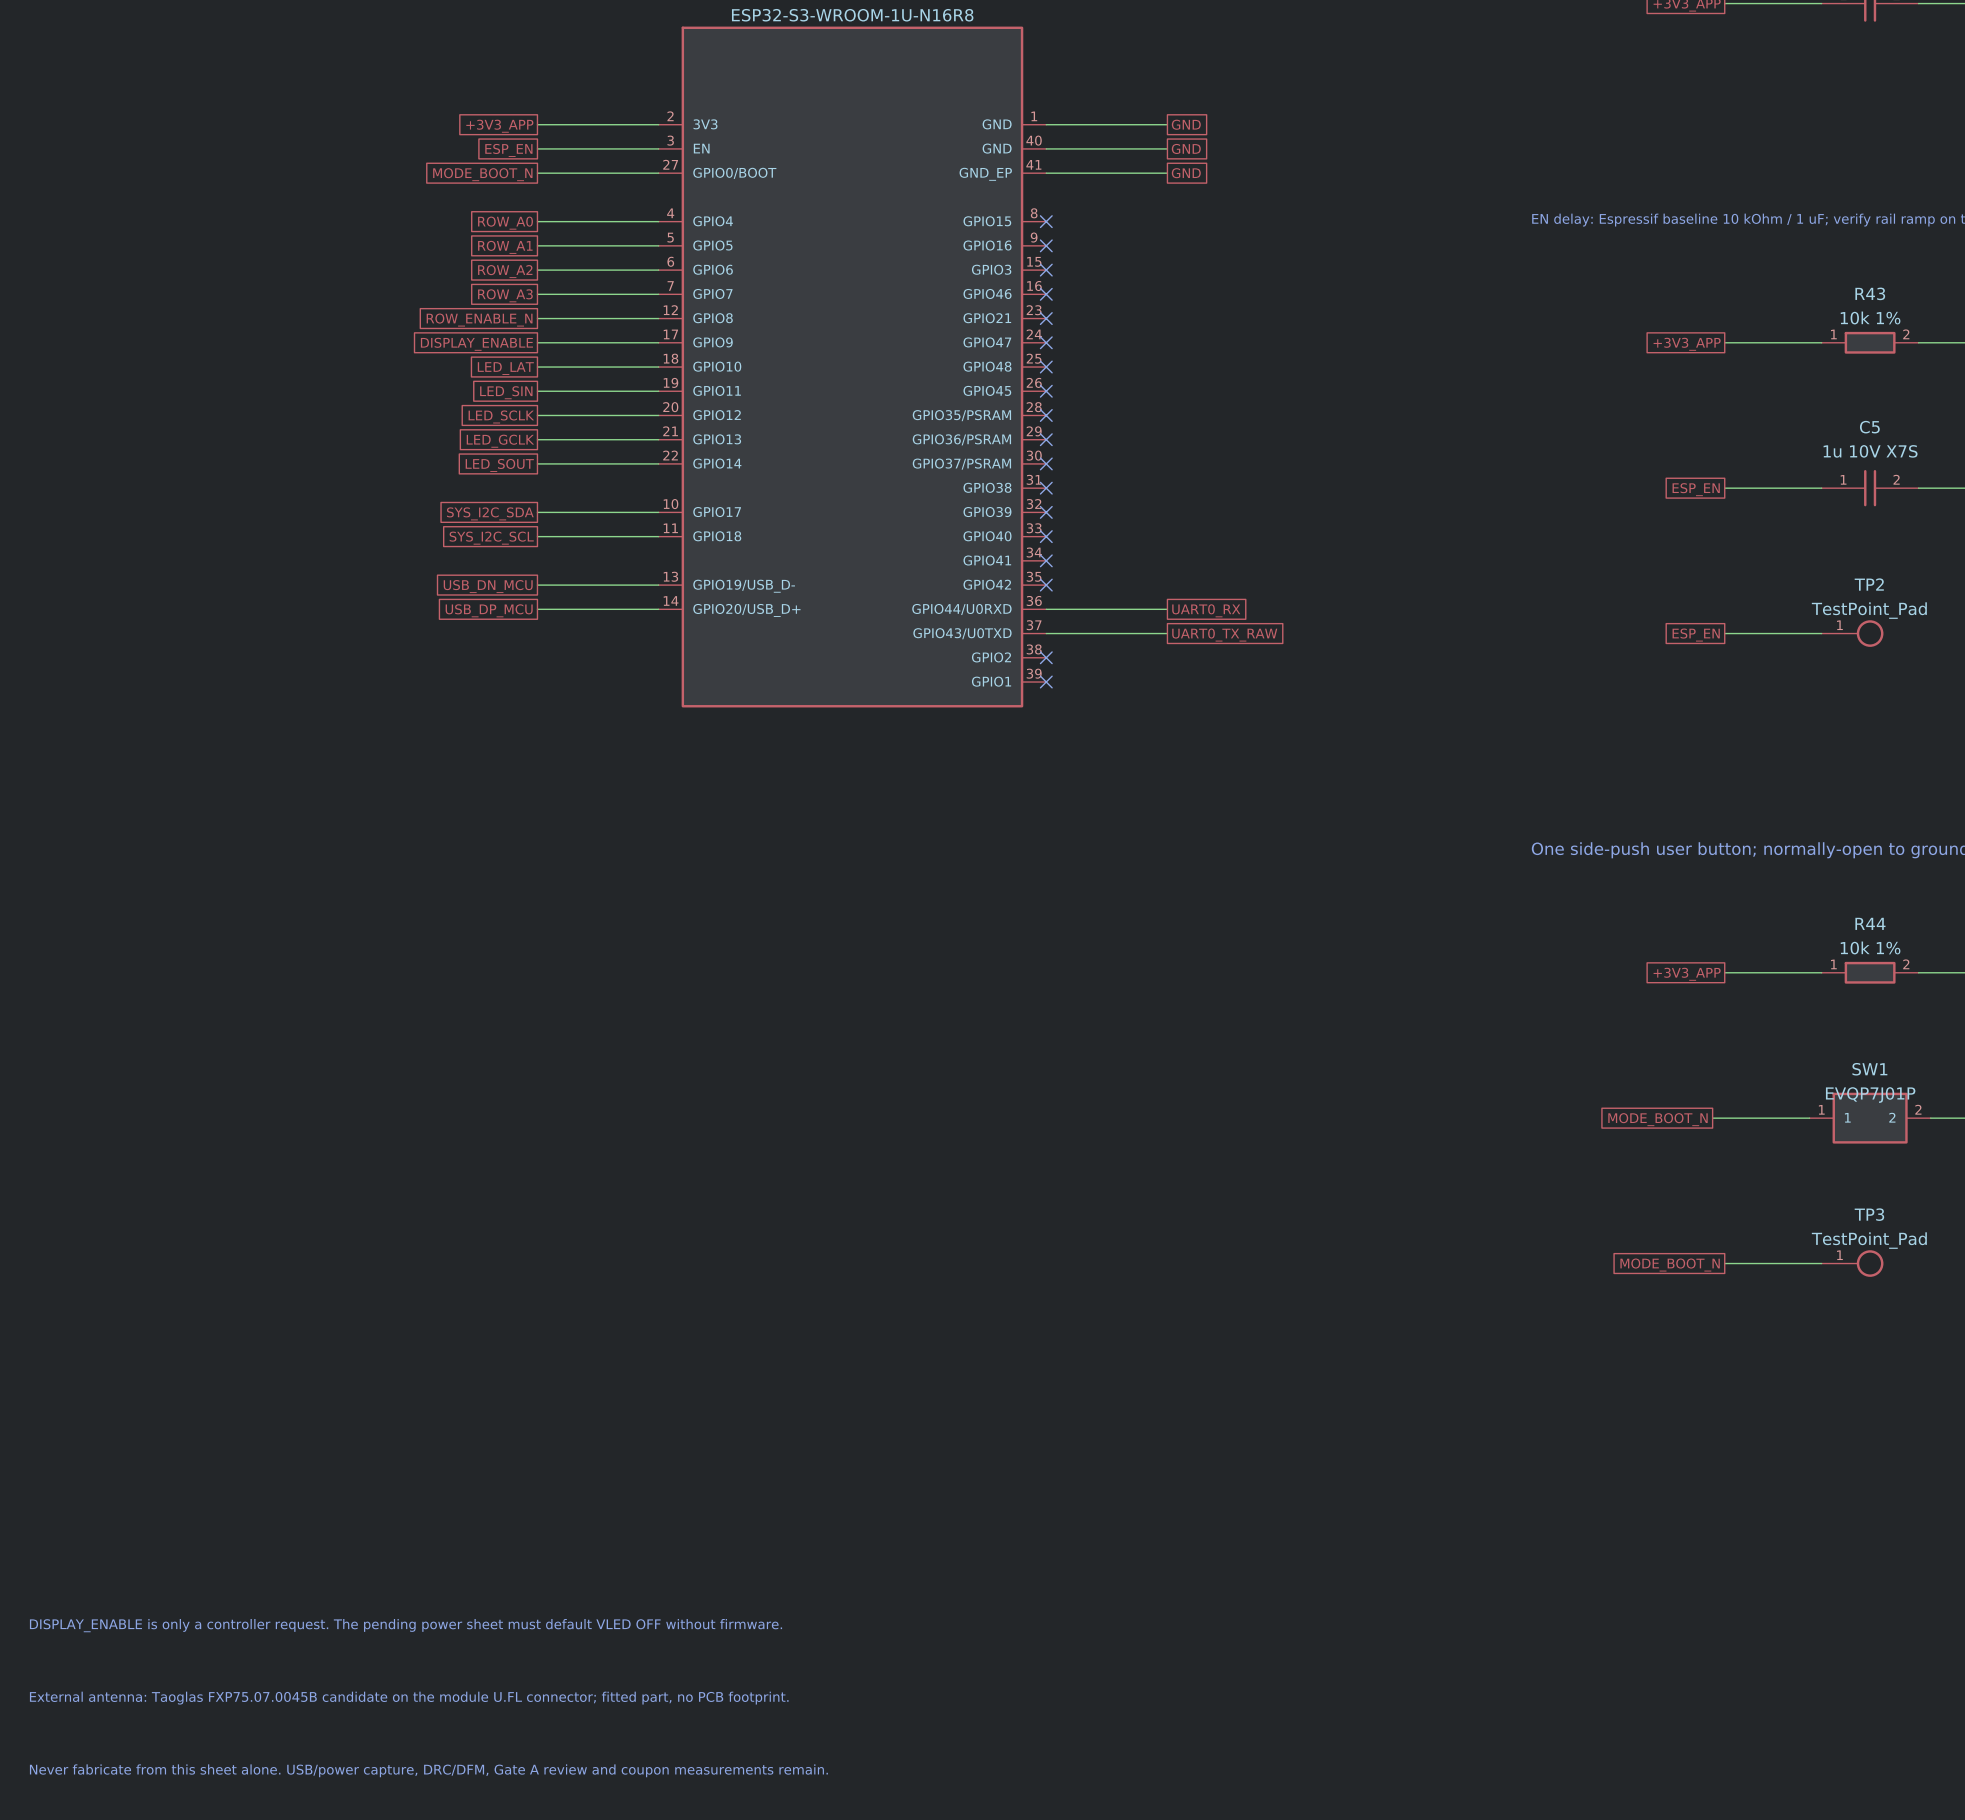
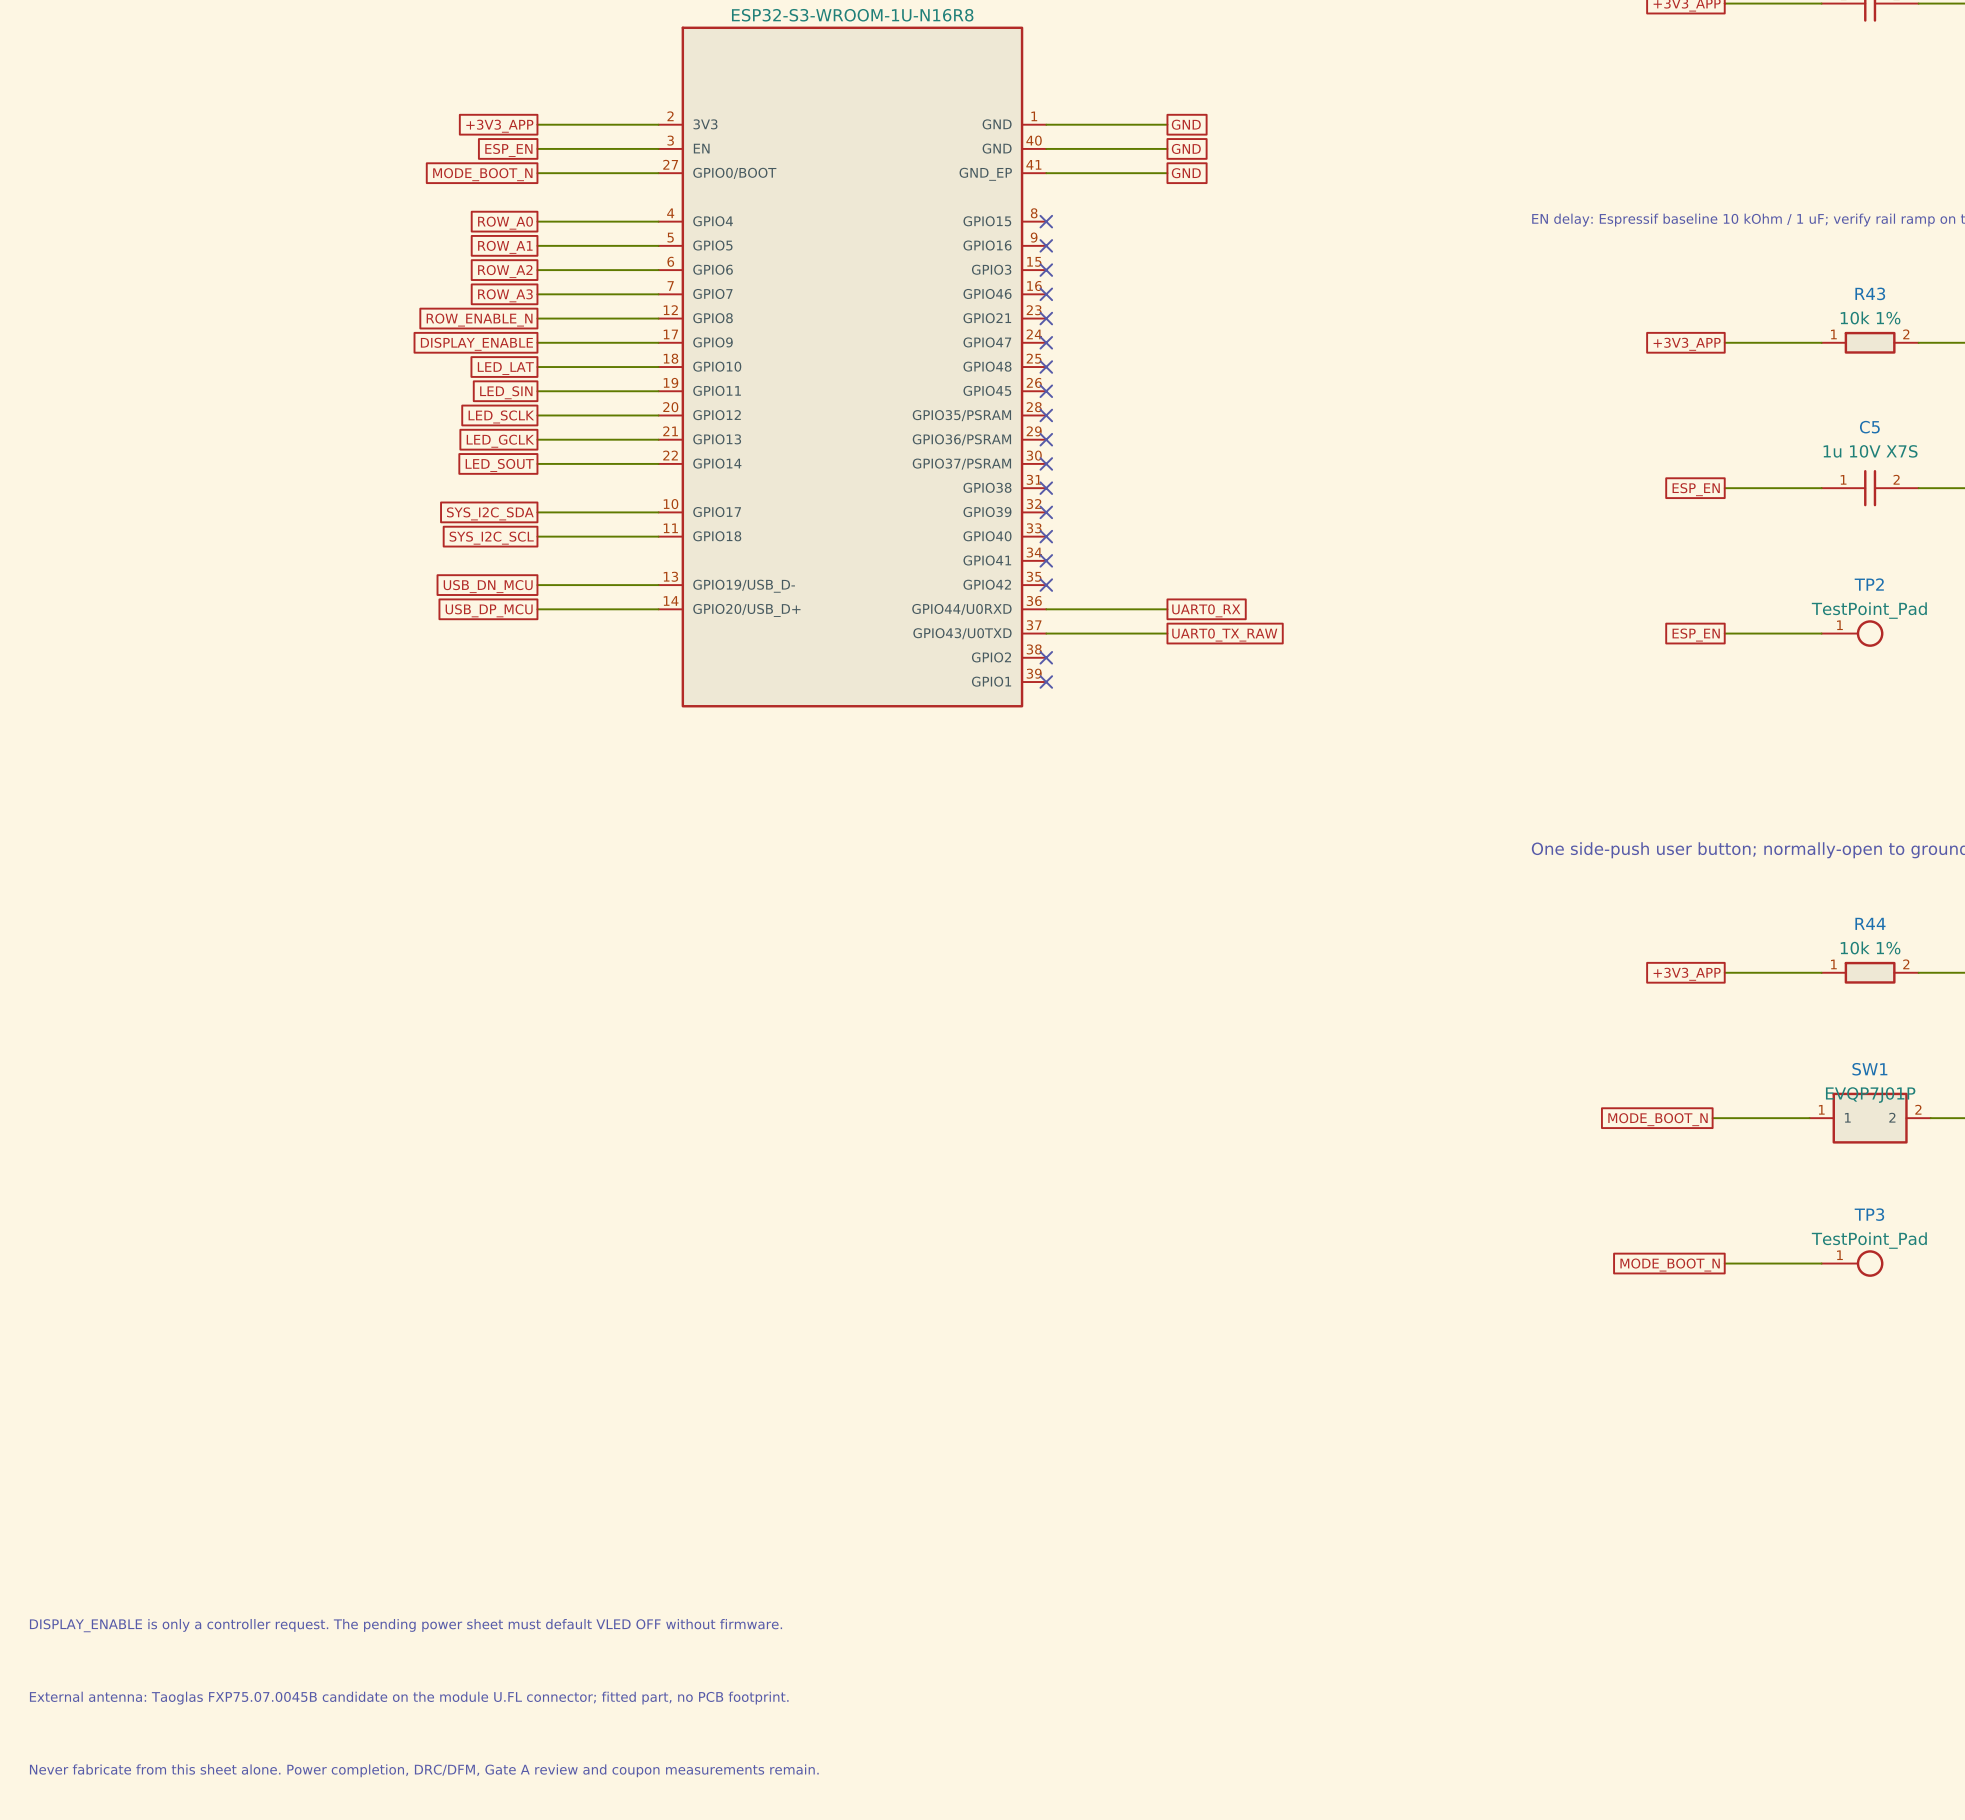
text: Never fabricate from this sheet alone. USB/power capture, DRC/DFM, Gate A review and coupon measurements remain. (428, 1770) -> Never fabricate from this sheet alone. Power completion, DRC/DFM, Gate A review and coupon measurements remain. (424, 1770)

